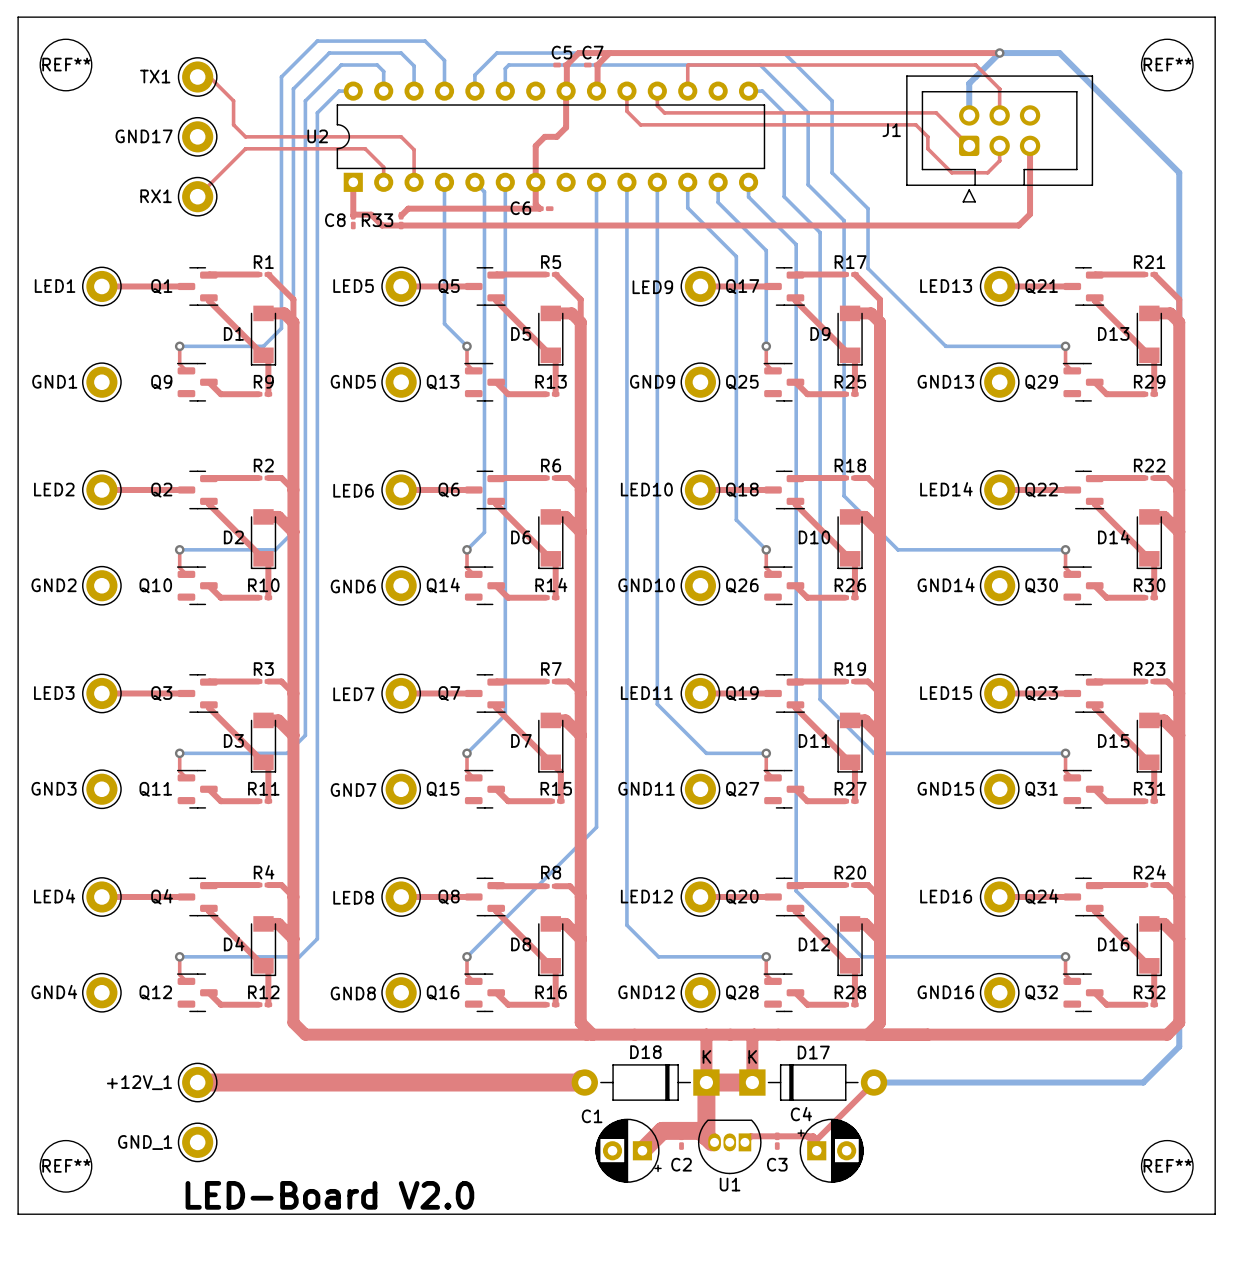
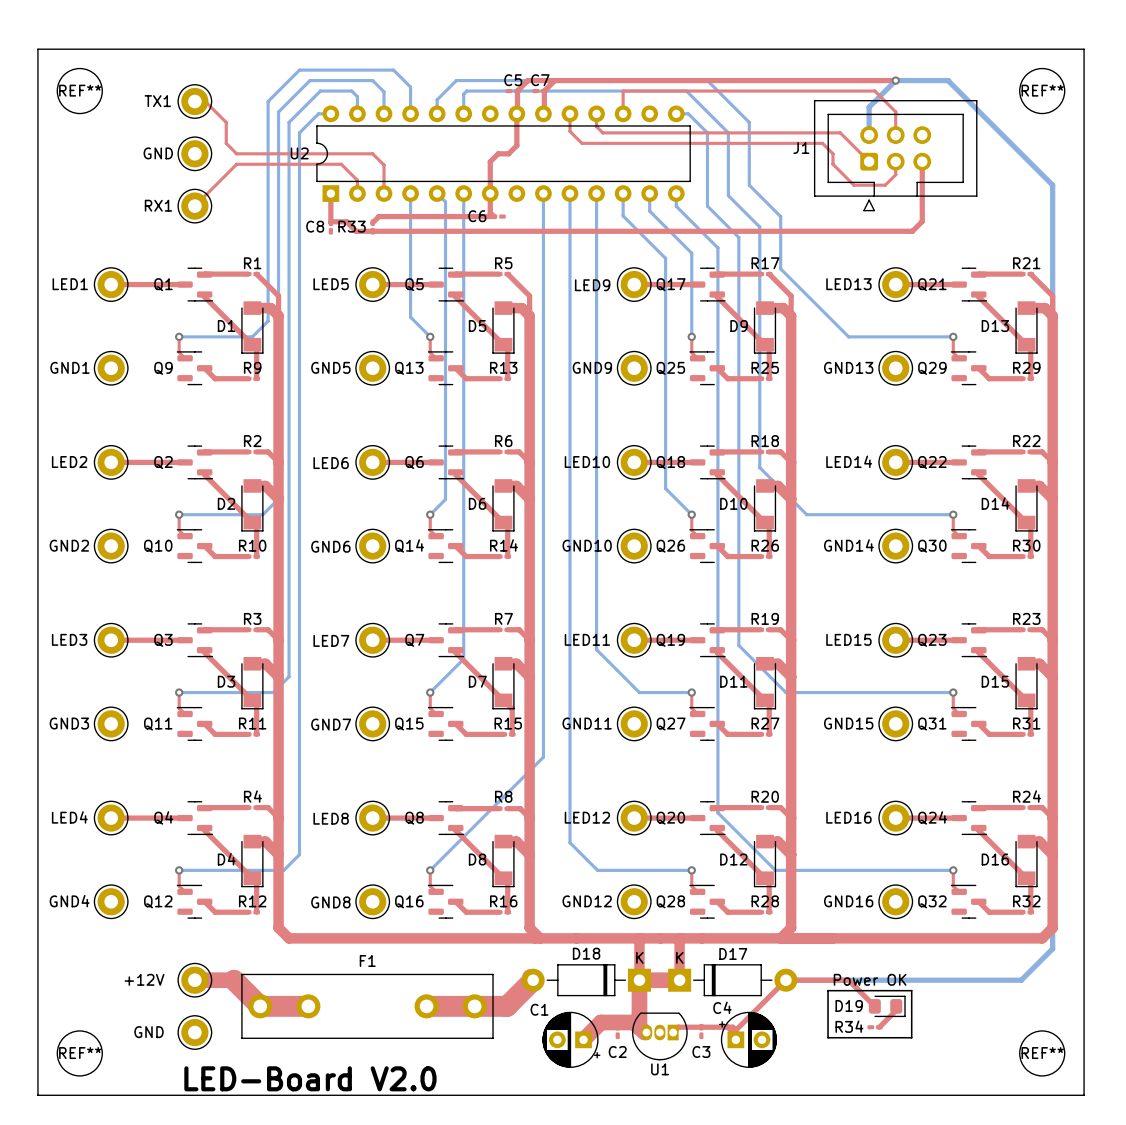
GND17 name: GND17 (144, 136) -> GND (158, 153)
+12V_1 name: +12V_1 (139, 1082) -> +12V (144, 979)
top track: (242, 1082) (584, 1082) -> (426, 1006) (507, 1006) (533, 980)
top track: none -> (234, 980) (260, 1006) (308, 1006)
top track: none -> (785, 980) (848, 980) (874, 1006)
text: none -> Power OK (870, 979)
line: none -> (828, 990) (911, 990) (911, 1037) (828, 1037) (828, 990)
F1: none -> (367, 1006)
D19: none -> (887, 1006)
top track: none -> (896, 1006) (896, 1010) (879, 1027)
R34: none -> (875, 1027)
GND_1 name: GND_1 (145, 1142) -> GND (149, 1032)

